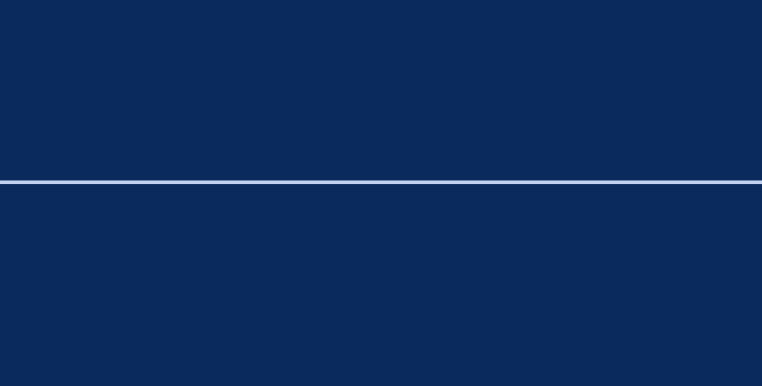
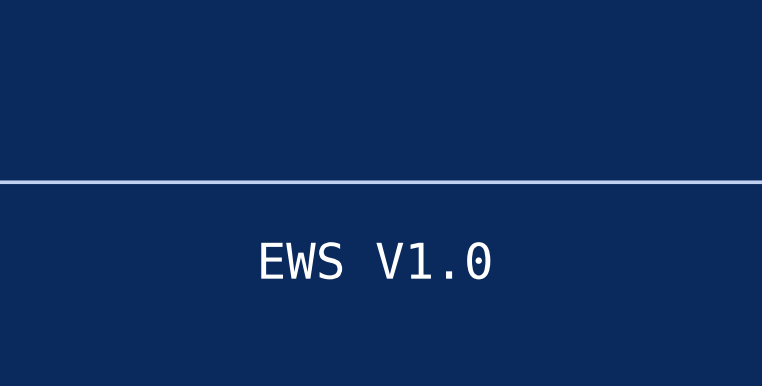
text: none -> EWS V1.0 (375, 260)

